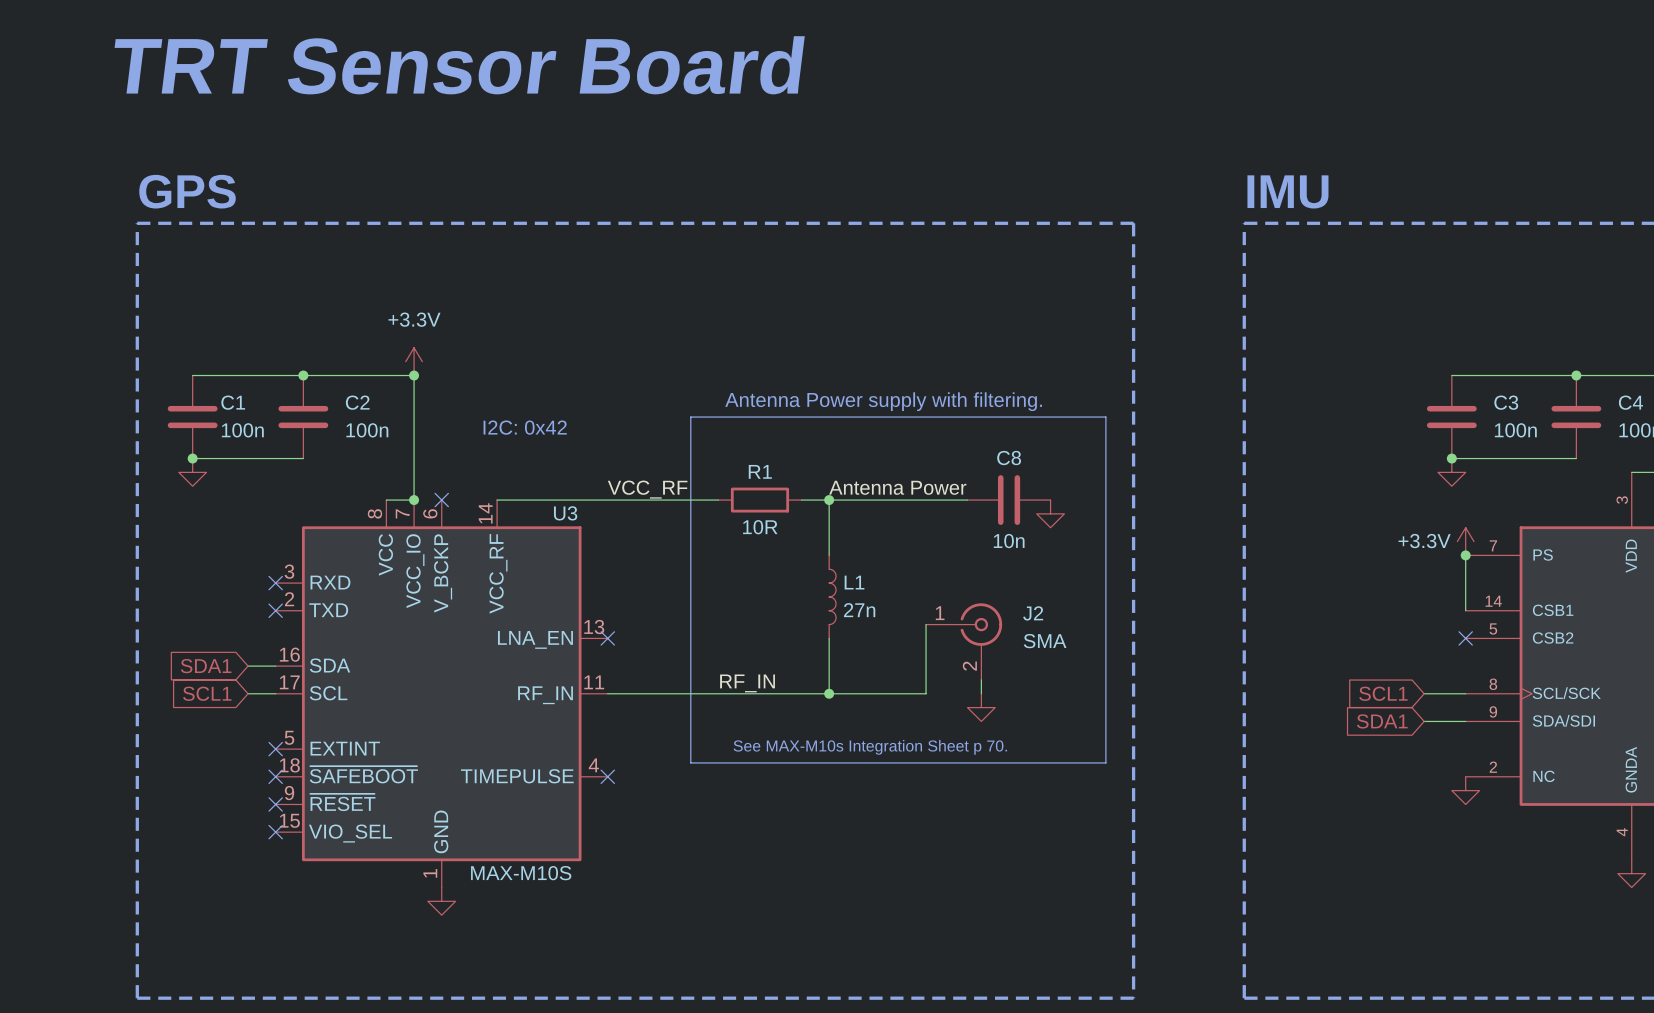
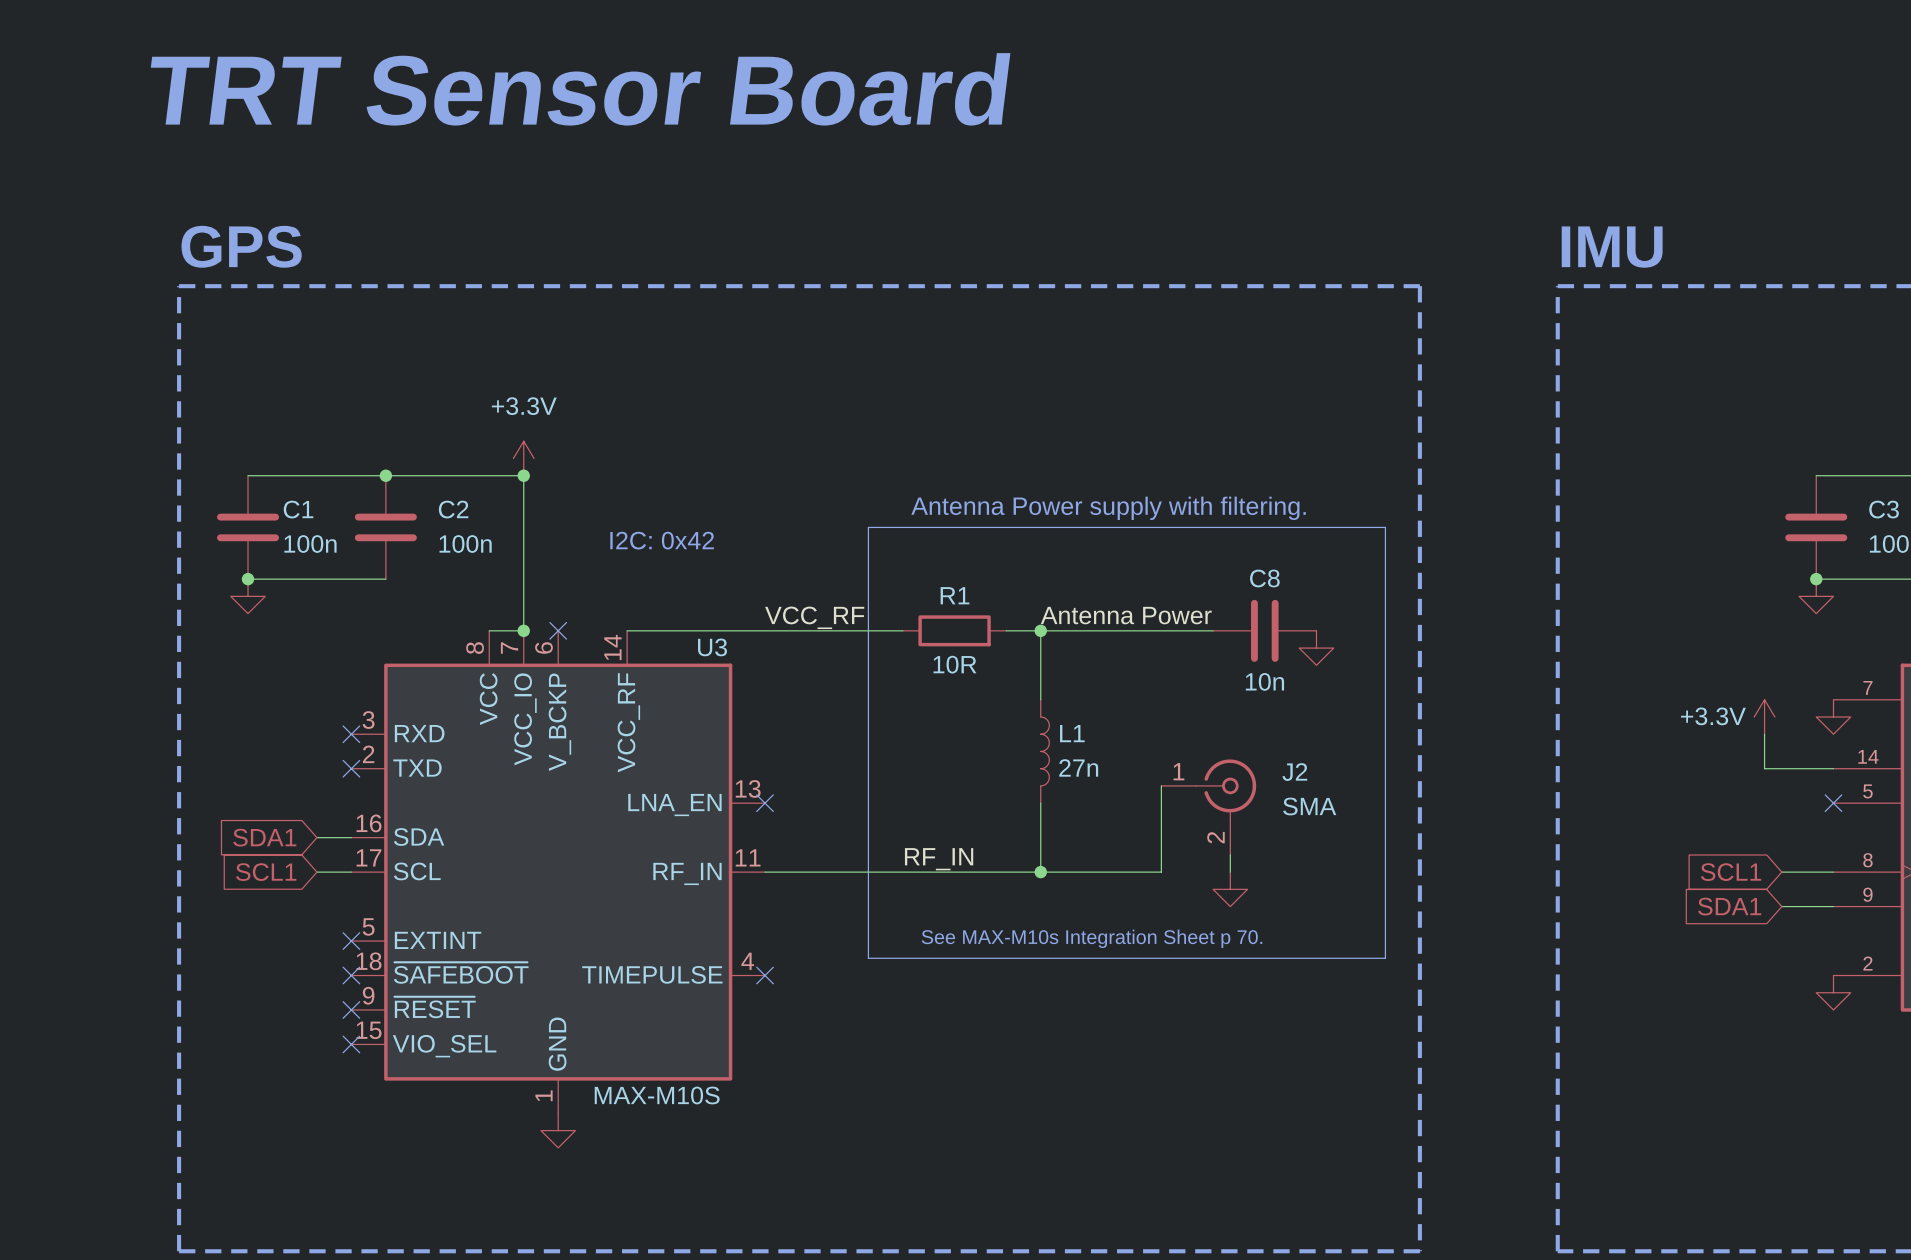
power symbol position: +3.3V (1465, 541) -> +3.3V (1764, 717)
wire: (1465, 555) (1465, 610) -> (1764, 734) (1764, 768) (1833, 768)
junction: (1465, 555) -> none
power symbol: none -> (1833, 717)

